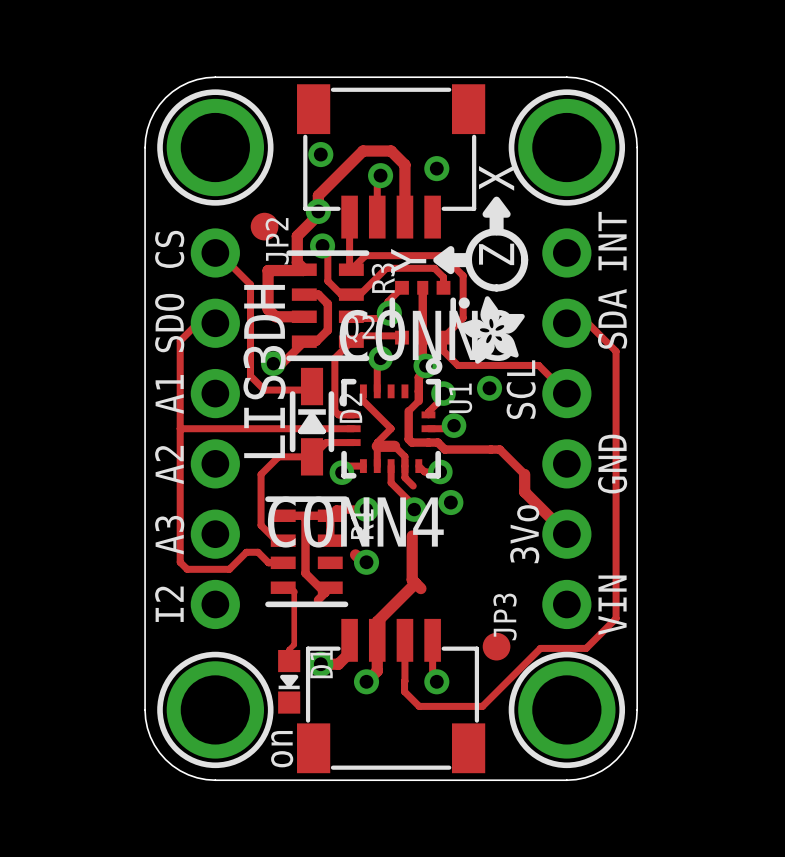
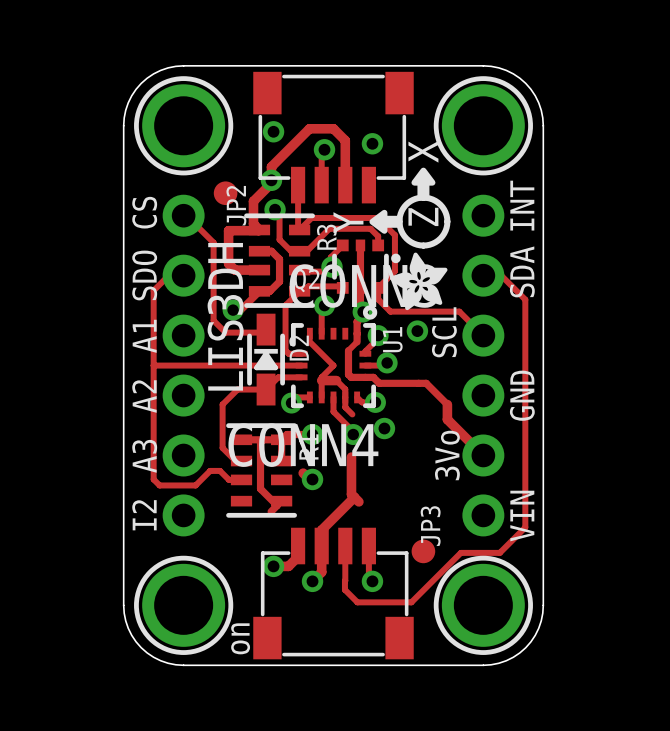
track: (283, 587) (290, 587) (294, 591) (294, 644) (289, 649) (289, 661) -> none
D1: (289, 681) -> none

